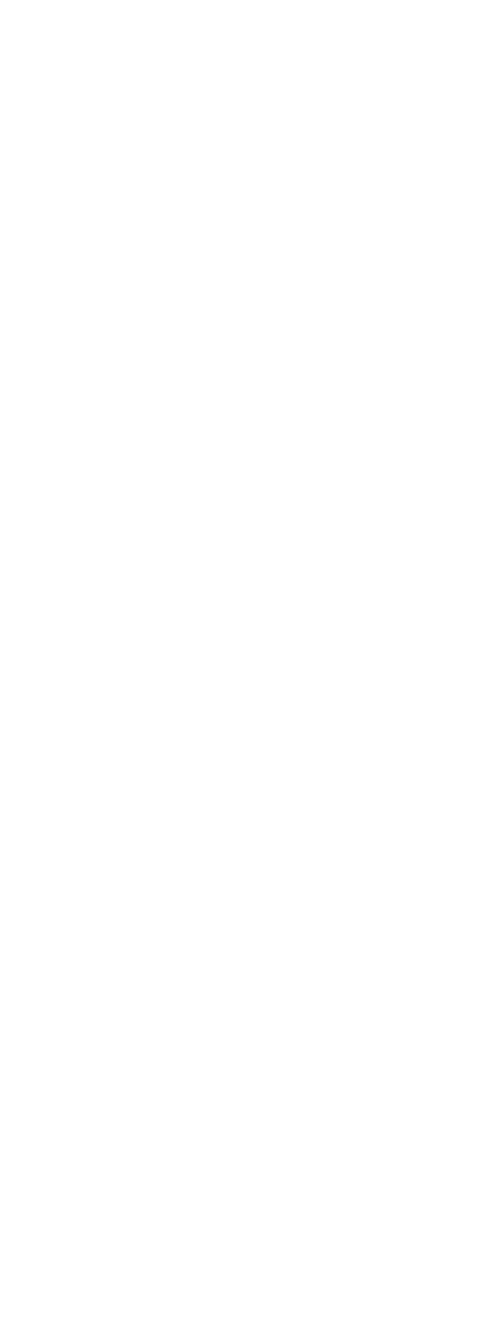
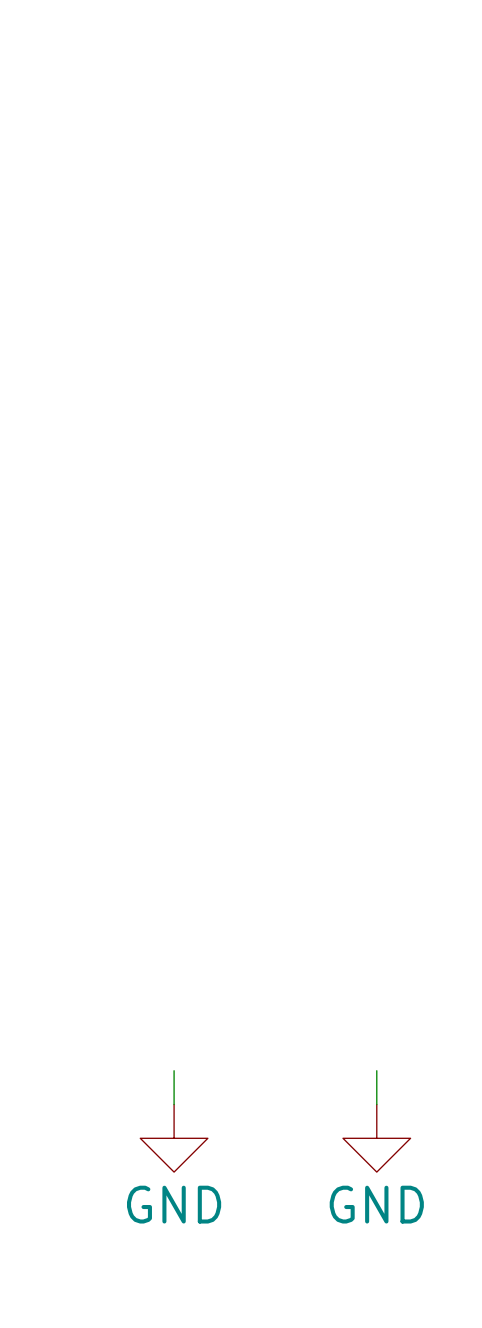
wire: none -> (174, 1070) (174, 1104)
wire: none -> (376, 1070) (376, 1104)
power symbol: none -> GND (174, 1138)
power symbol: none -> GND (376, 1138)

